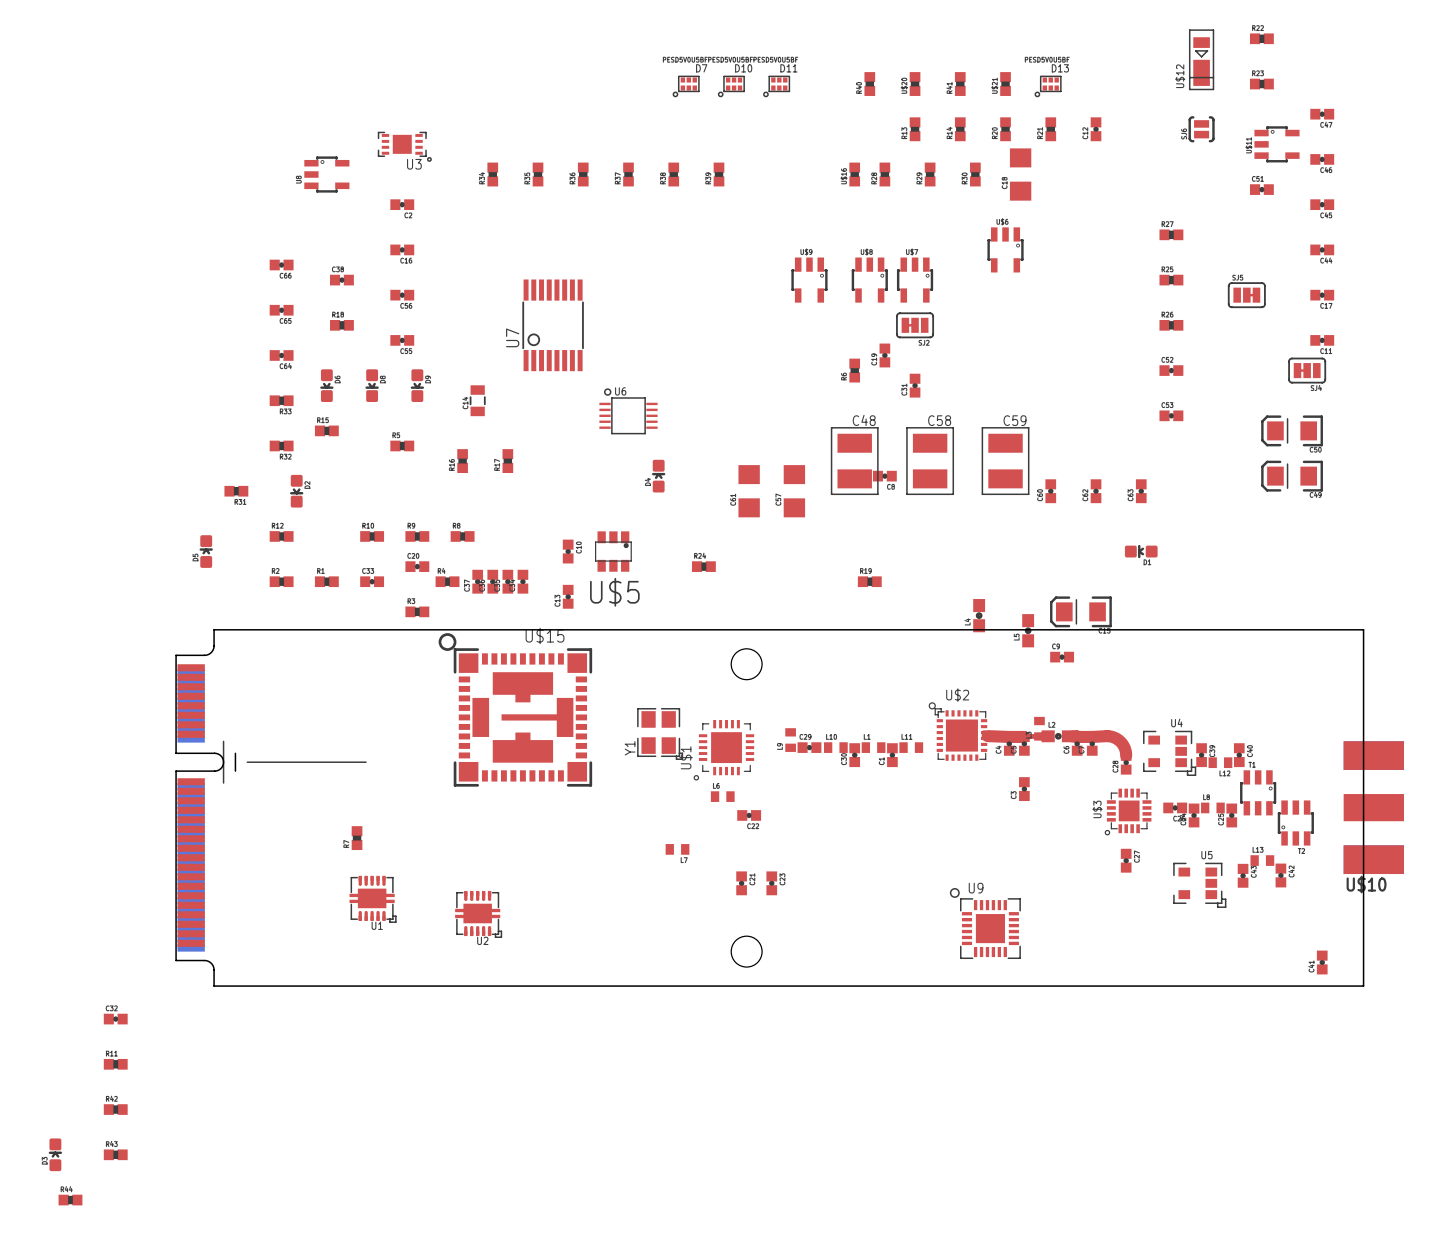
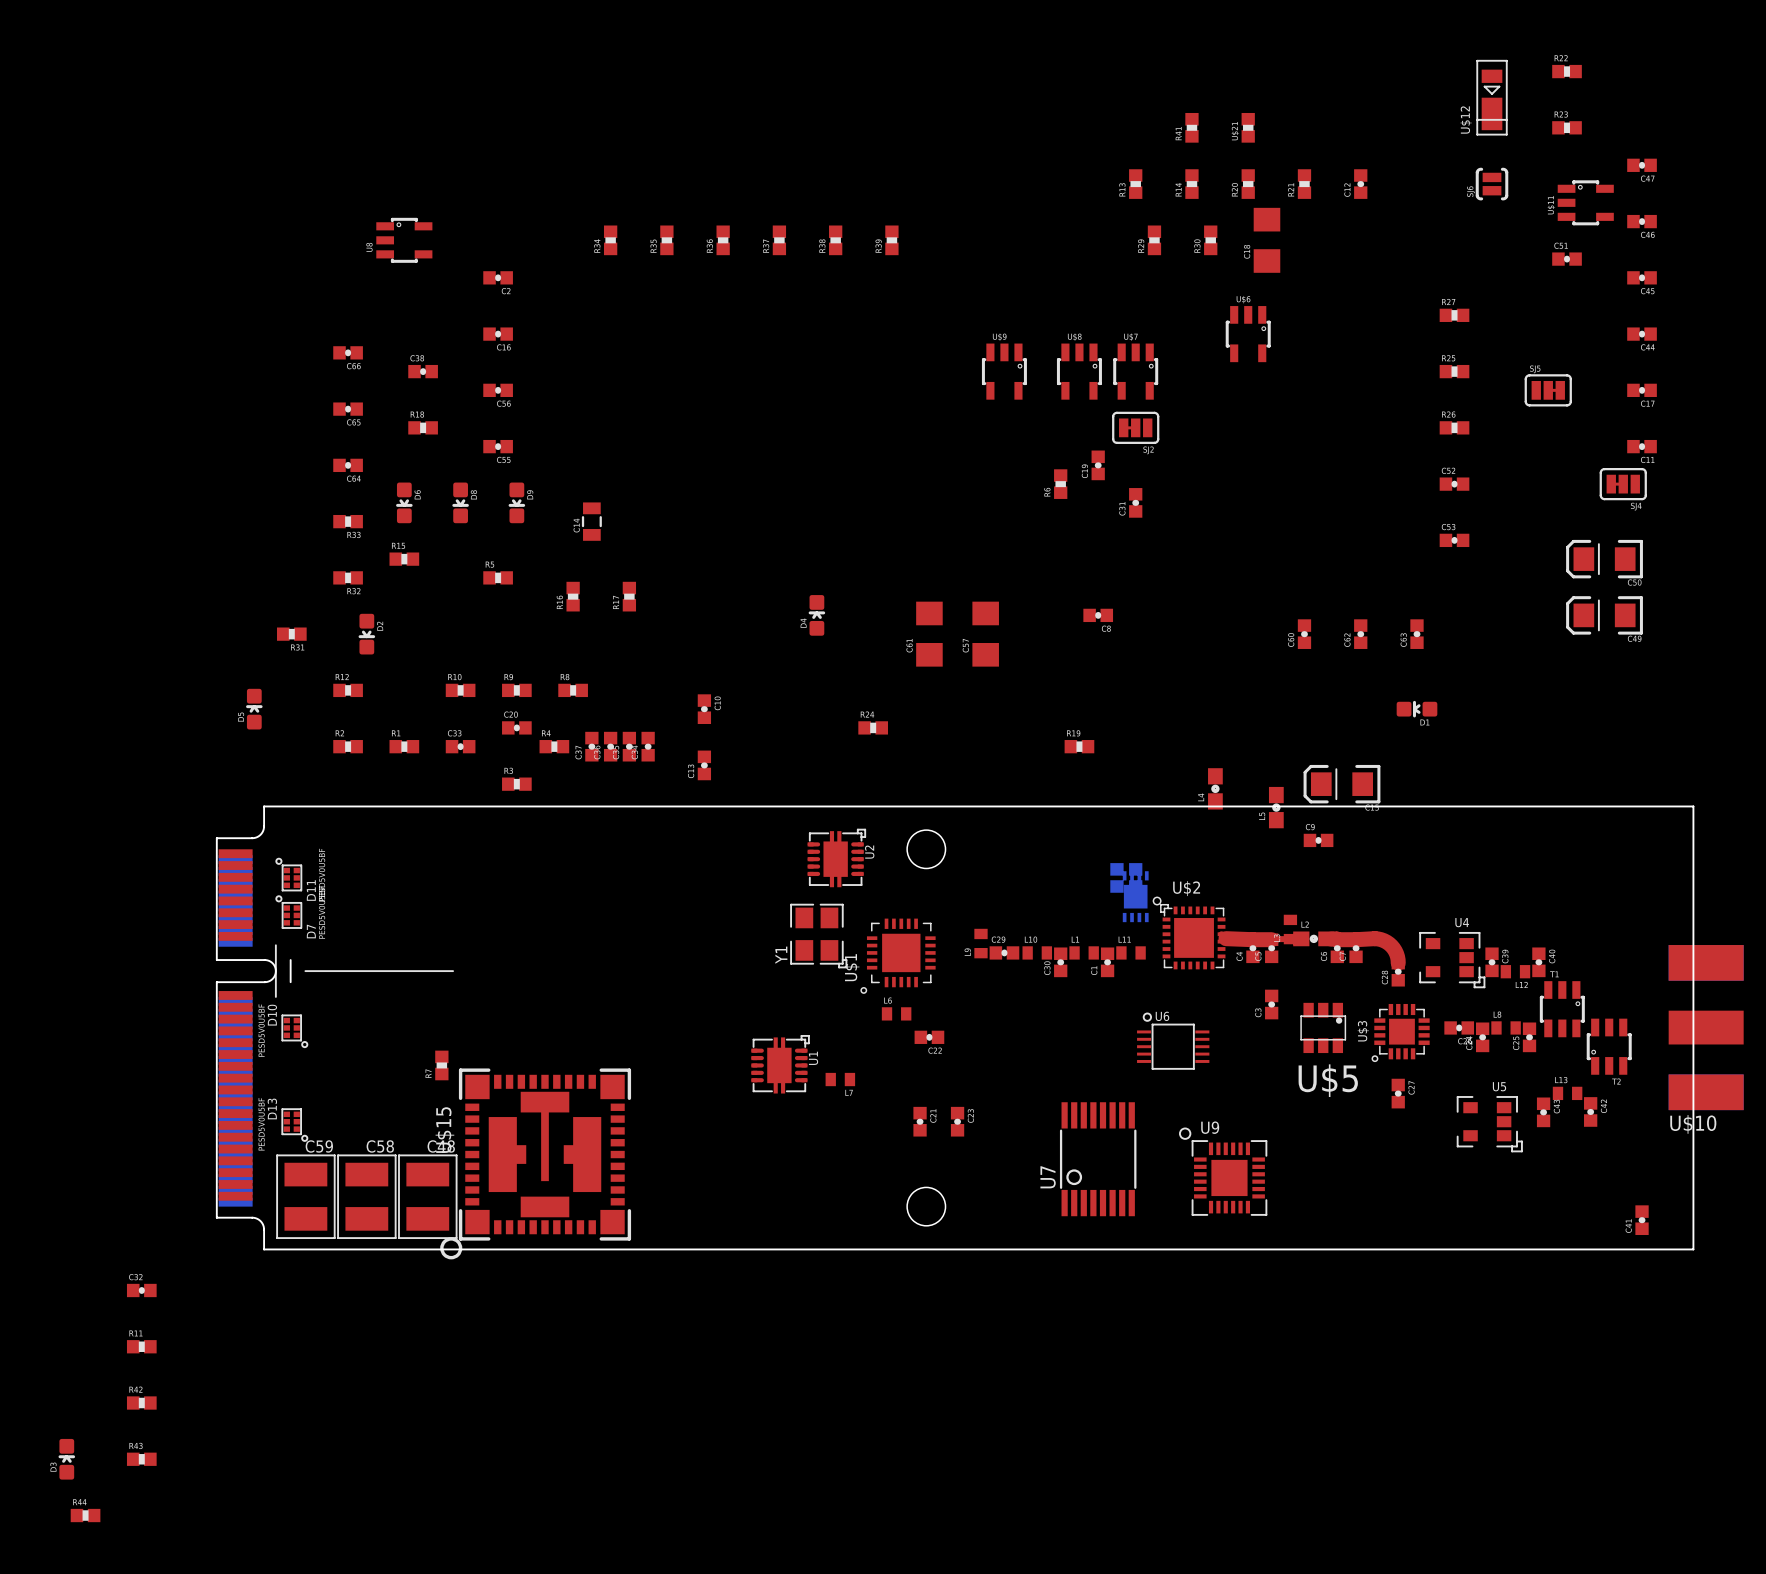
part: (869, 84) -> none
part: (915, 84) -> none
D7 rotation: 0° (686, 86) -> 90° clockwise (288, 912)
D7 position: (686, 86) -> (288, 912)
D10 rotation: 0° (731, 86) -> 90° counterclockwise (294, 1031)
D10 position: (731, 86) -> (294, 1031)
D11 rotation: 0° (776, 86) -> 90° clockwise (288, 874)
D11 position: (776, 86) -> (288, 874)
D13 rotation: 0° (1048, 86) -> 90° counterclockwise (294, 1125)
D13 position: (1048, 86) -> (294, 1125)
U3: (404, 146) -> none
part: (854, 174) -> none
part: (884, 174) -> none
U7 position: (553, 325) -> (1098, 1159)
U6 position: (628, 411) -> (1173, 1041)
C48 position: (854, 461) -> (427, 1196)
C58 position: (930, 461) -> (366, 1196)
C59 position: (1005, 461) -> (305, 1196)
U$5 position: (613, 551) -> (1323, 1027)
part: none -> (1116, 877)
part: none -> (1135, 877)
part: none -> (1135, 896)
U$15 rotation: 0° (515, 709) -> 90° counterclockwise (535, 1163)
U$15 position: (515, 709) -> (535, 1163)
U1 rotation: 0° (373, 899) -> 90° counterclockwise (780, 1064)
U1 position: (373, 899) -> (780, 1064)
U2 rotation: 0° (478, 914) -> 90° counterclockwise (836, 857)
U2 position: (478, 914) -> (836, 857)

